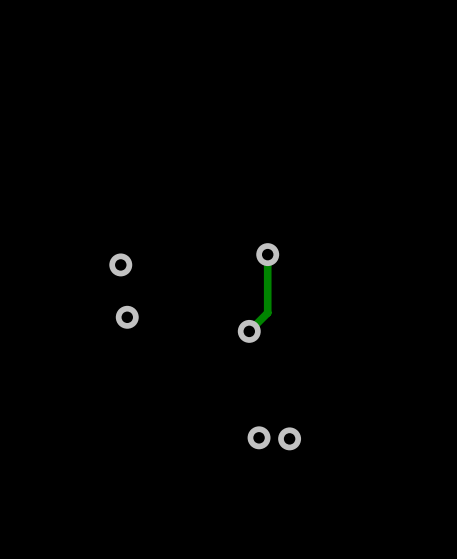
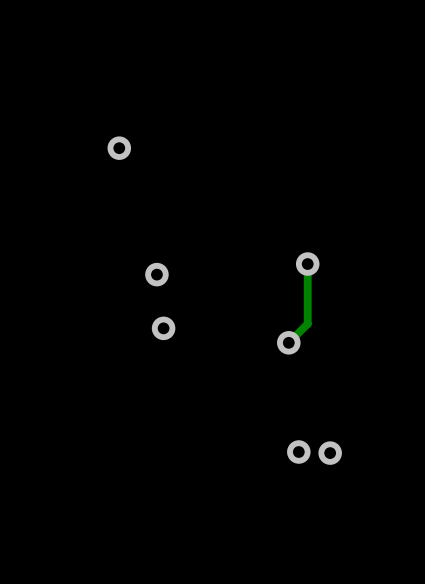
via: none -> (119, 148)

